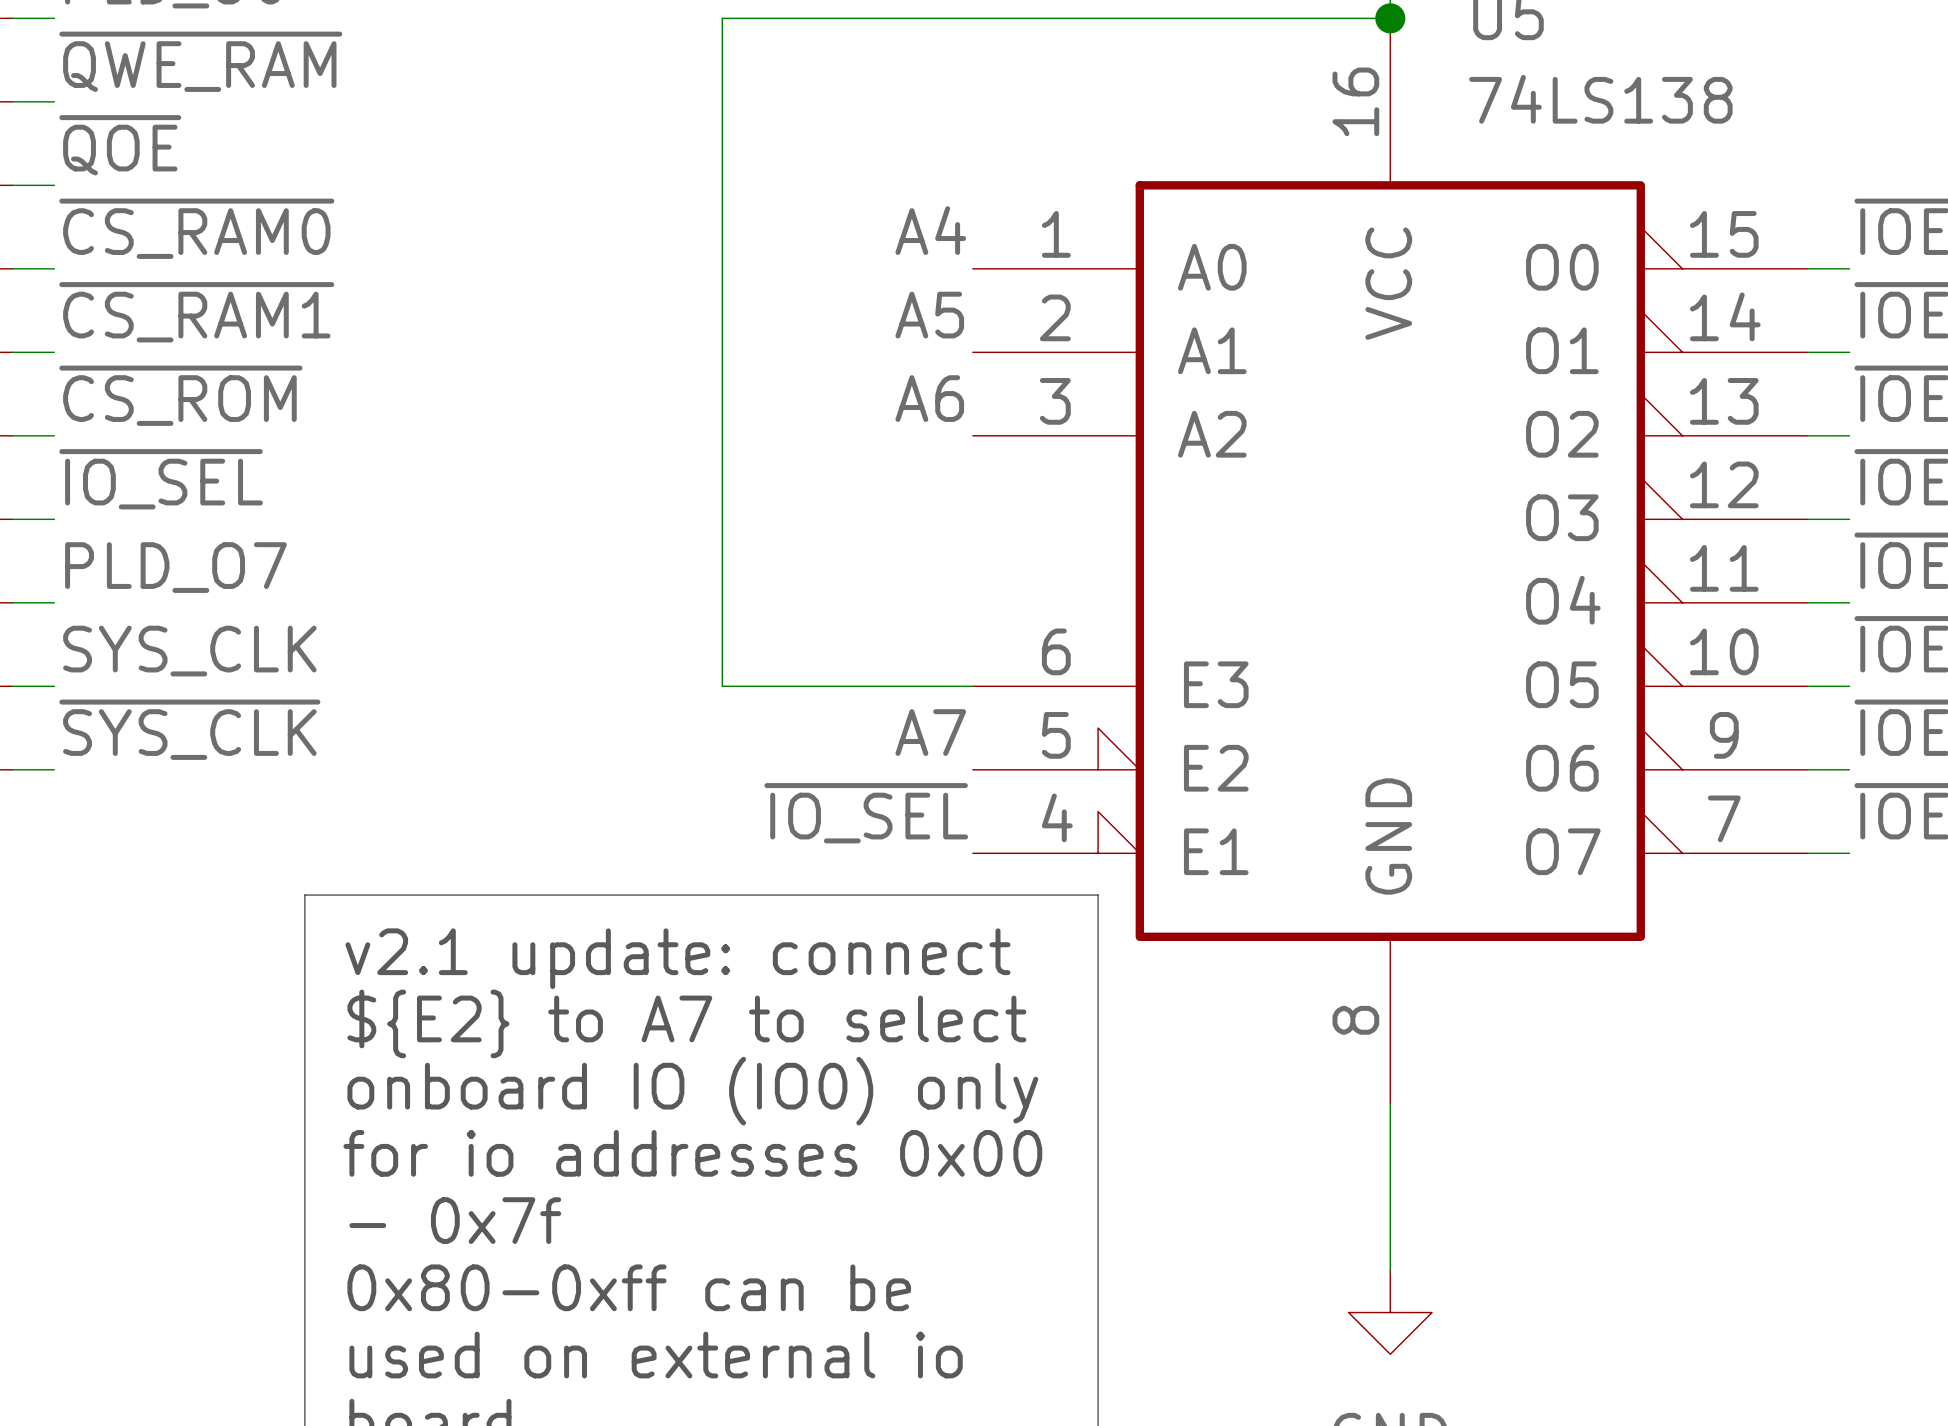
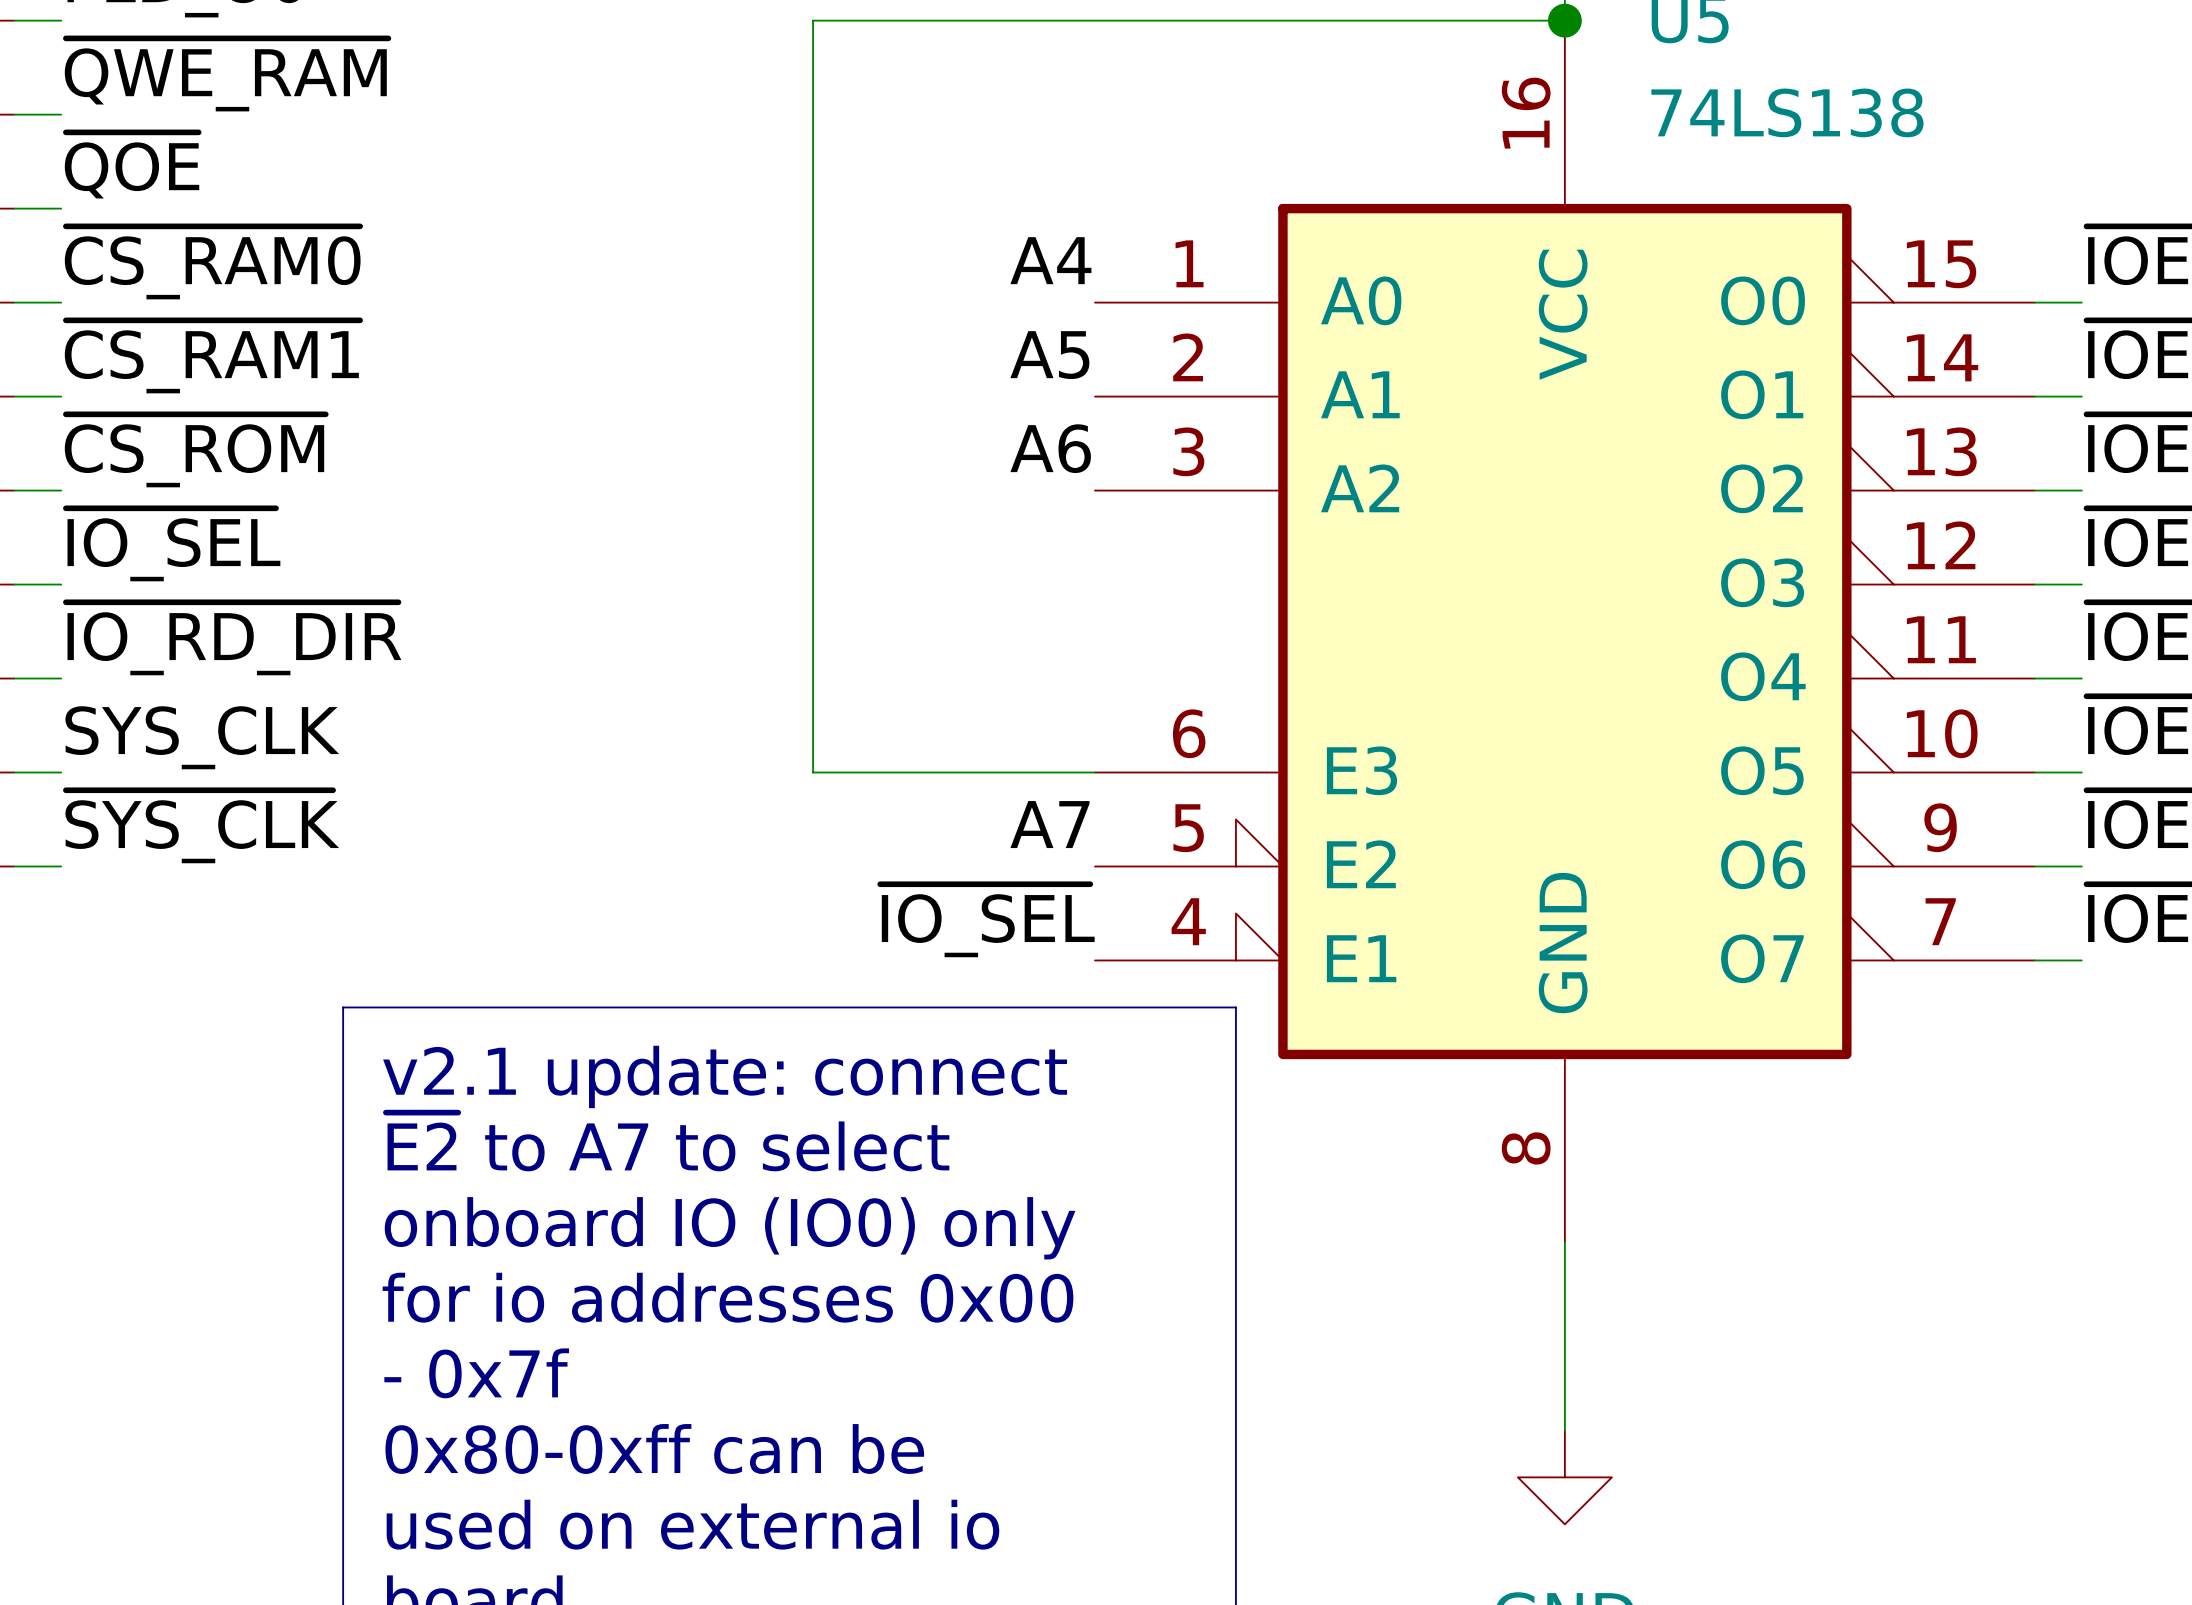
label: PLD_O7 (175, 567) -> ~{IO_RD_DIR} (233, 638)
text: ${E2} to A7 to select (686, 1023) -> ~{E2} to A7 to select (667, 1141)

